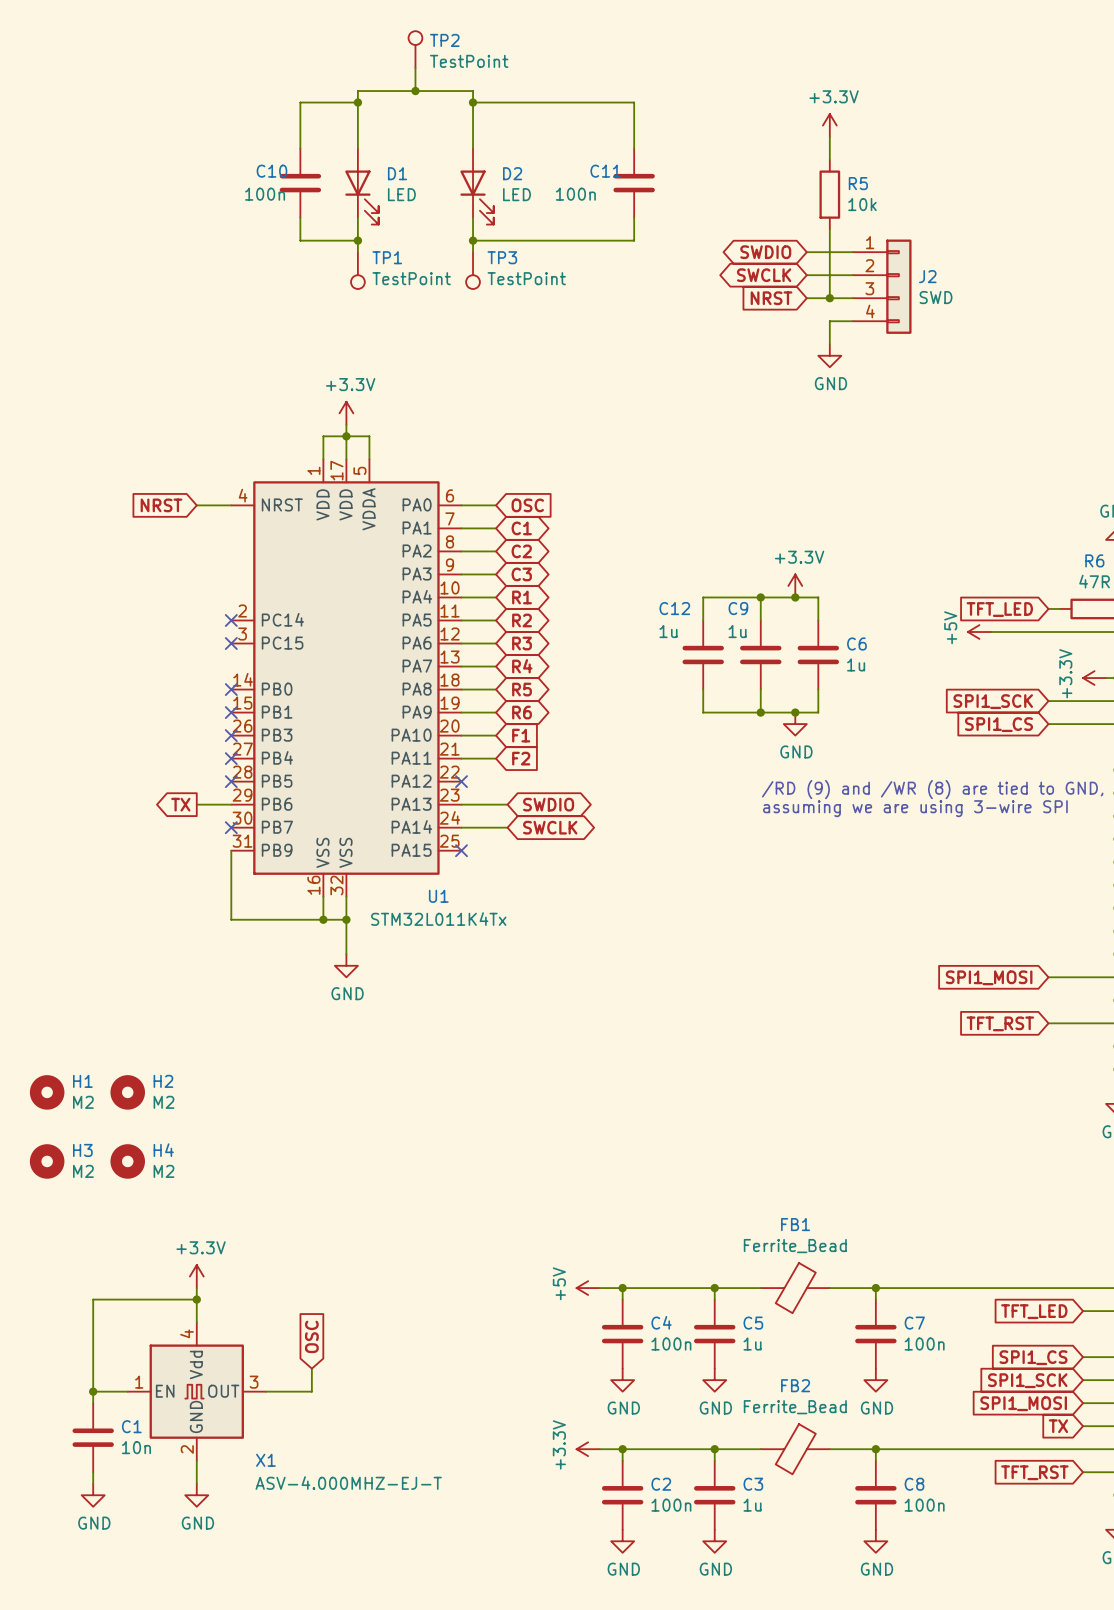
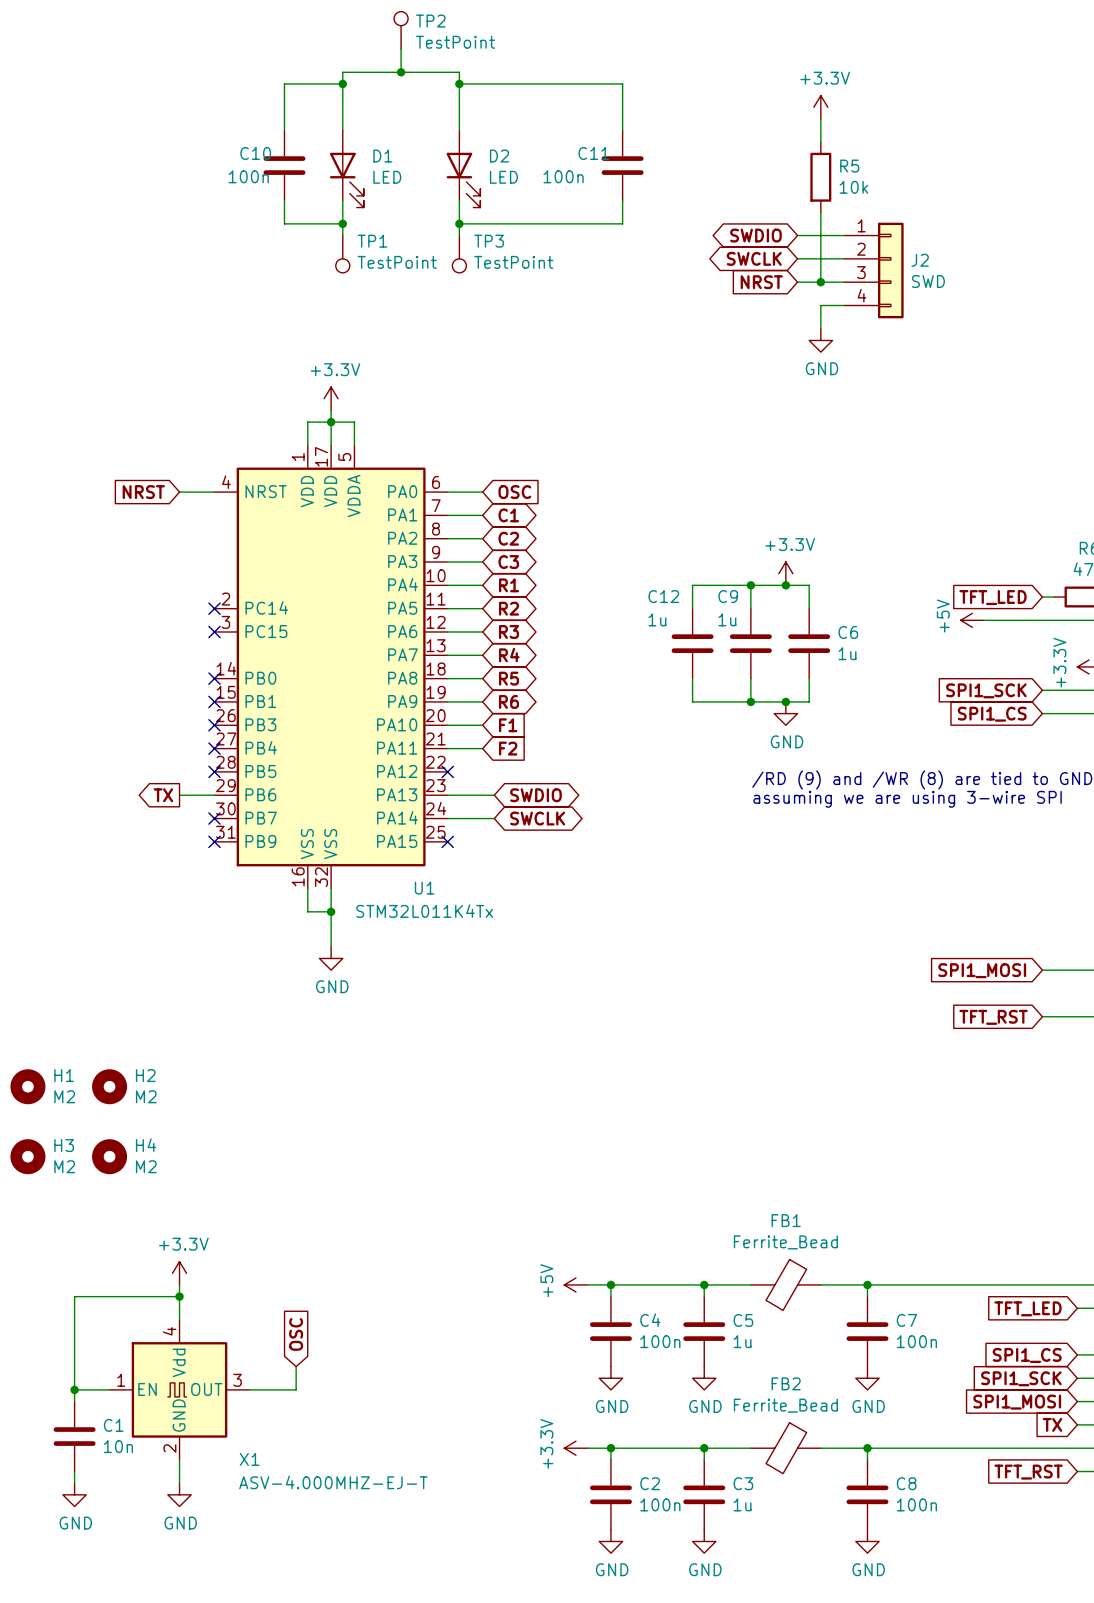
wire: (231, 850) (231, 919) (323, 919) -> none
no-connect mark: none -> (214, 841)
junction: (323, 919) -> none

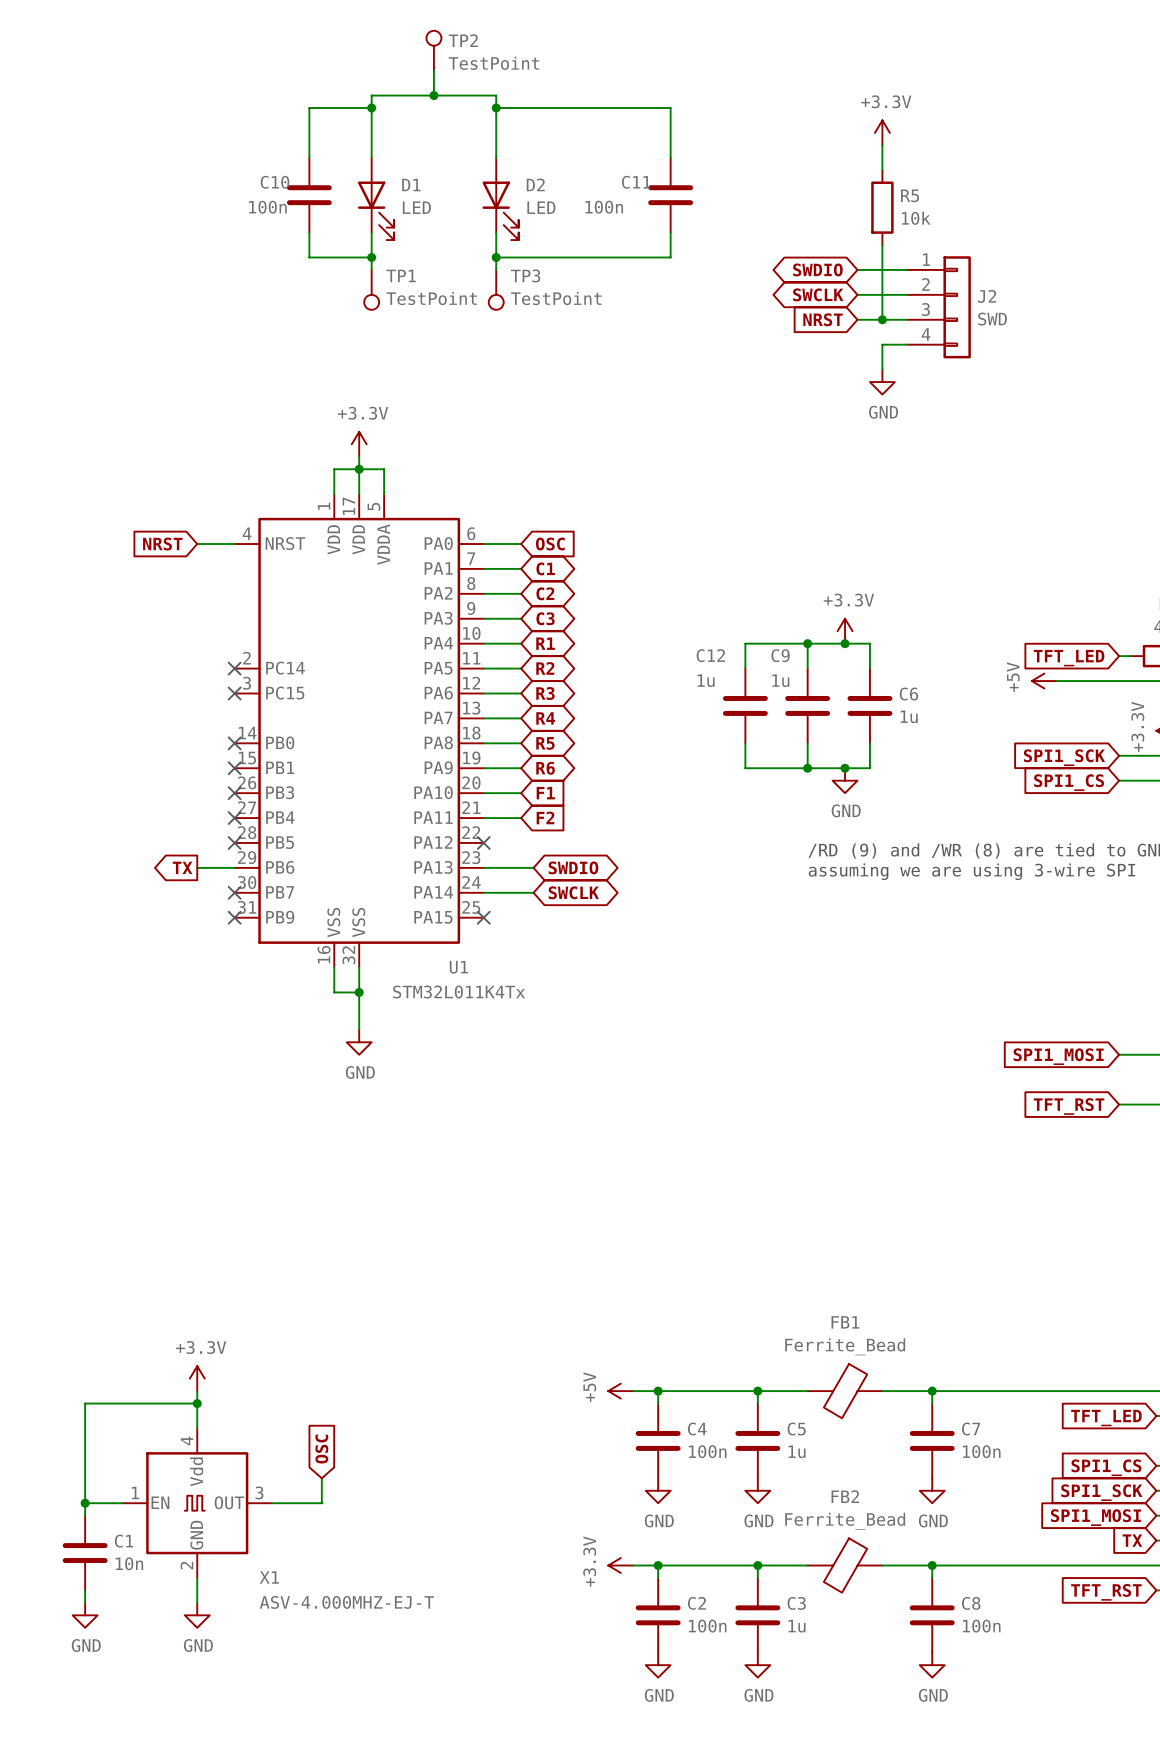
H1: M2 (27, 1086) -> none
H2: M2 (109, 1086) -> none
H3: M2 (27, 1156) -> none
H4: M2 (109, 1156) -> none

